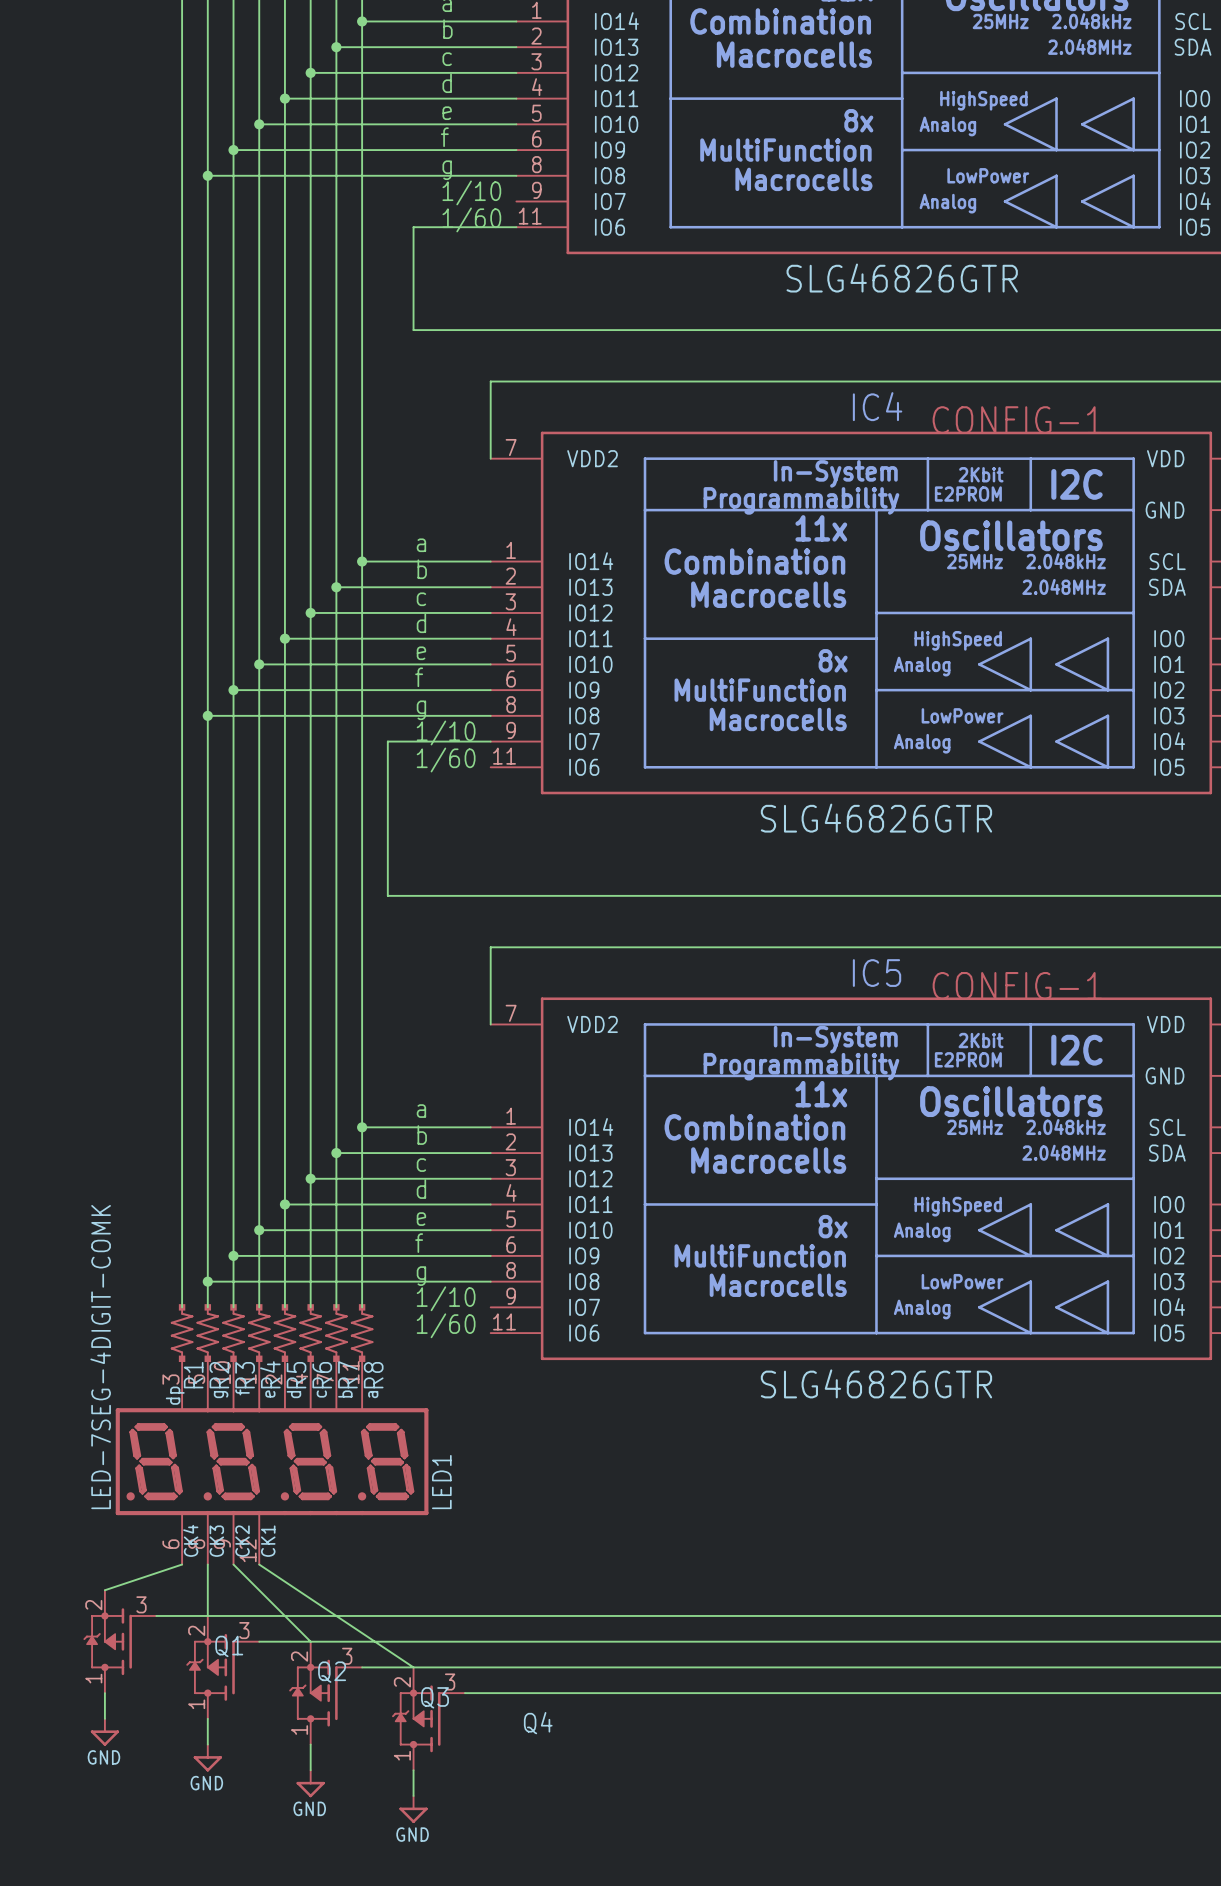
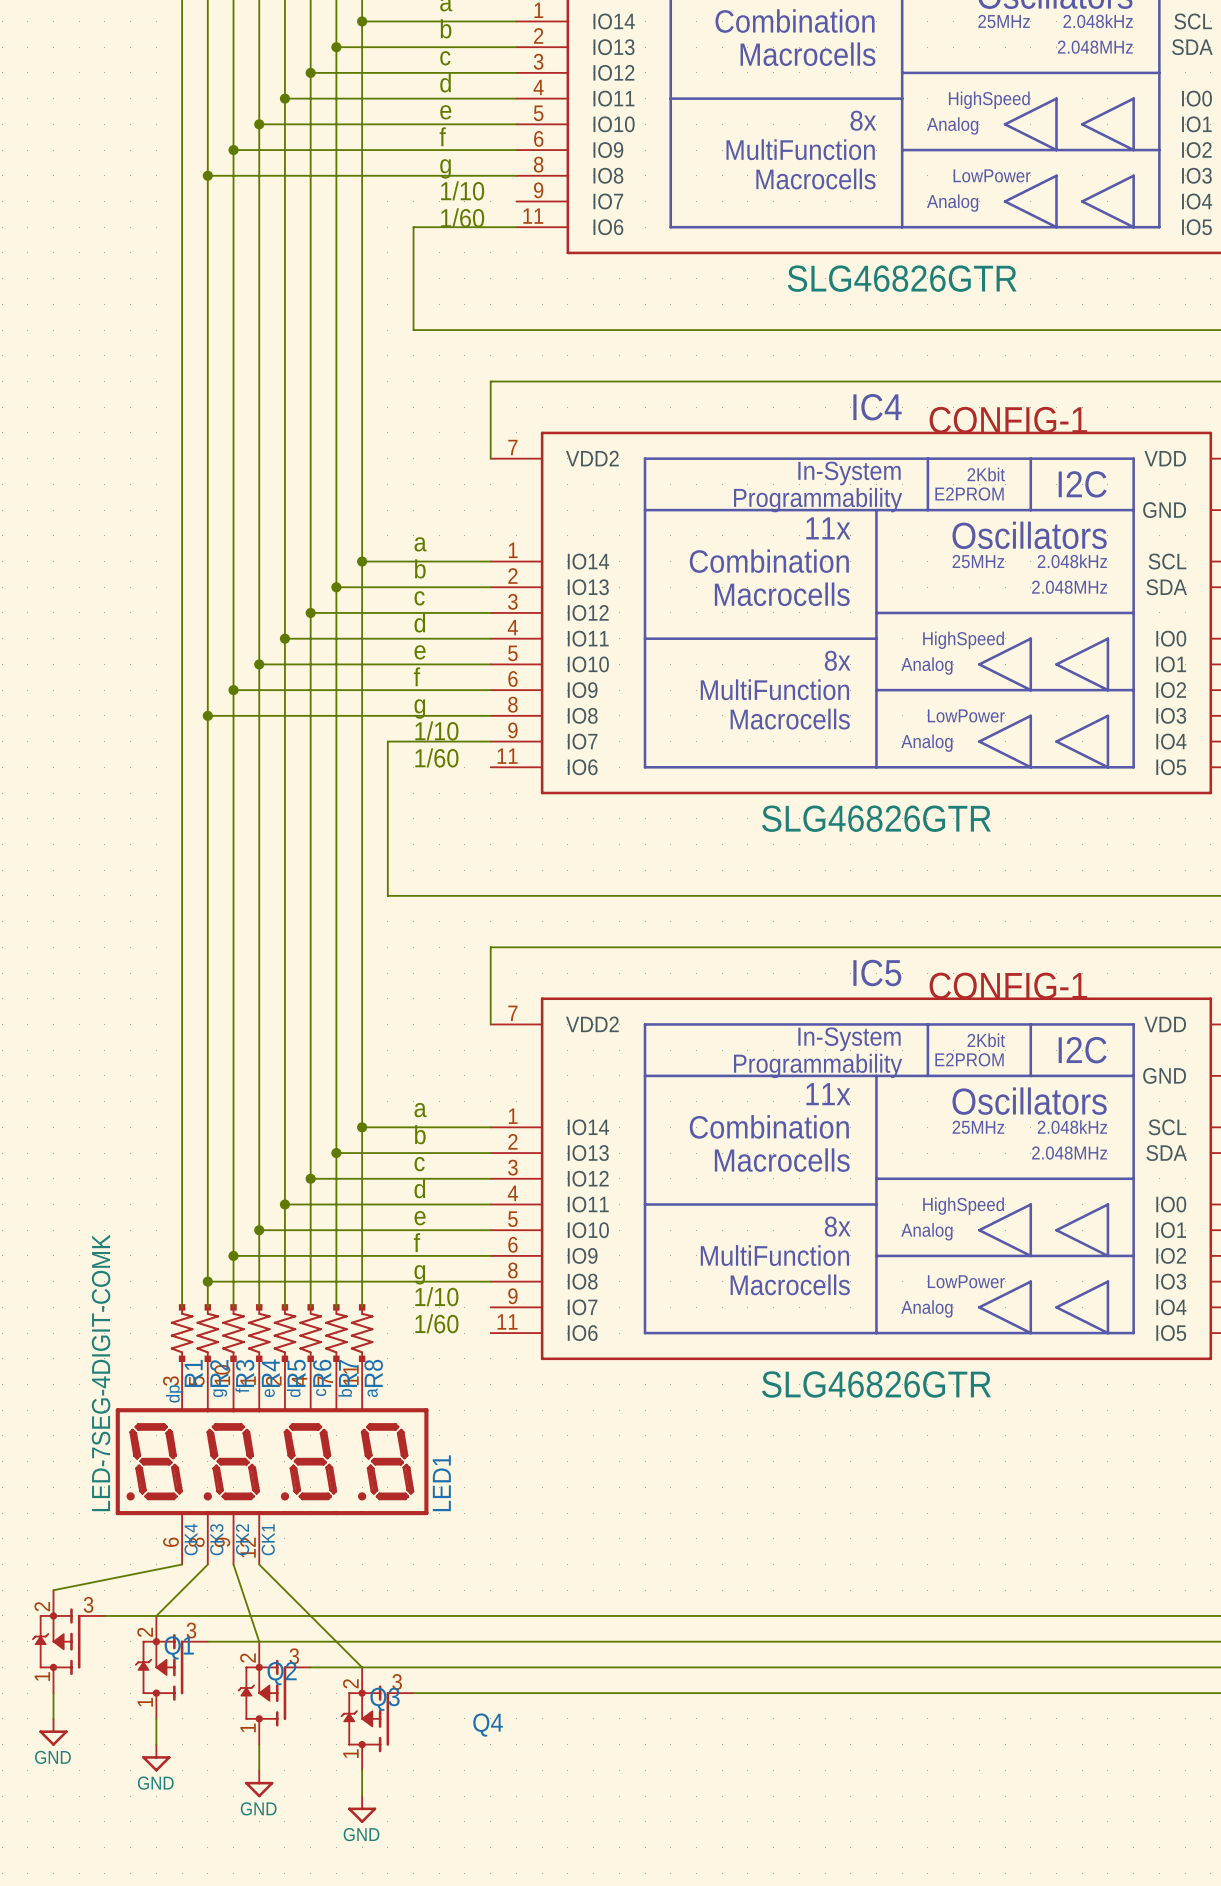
wire: (182, 1564) (104, 1590) -> (182, 1564) (53, 1590)
wire: (207, 1564) (207, 1615) -> (207, 1564) (156, 1615) (104, 1615)
wire: (233, 1564) (310, 1641) -> (233, 1564) (259, 1641) (207, 1641)
wire: (259, 1564) (413, 1667) -> (259, 1564) (362, 1667) (310, 1667)
Q1 position: (119, 1641) -> (68, 1641)
Q2 position: (222, 1667) -> (171, 1667)
wire: (104, 1693) (104, 1718) -> (53, 1693) (53, 1718)
Q3 position: (325, 1693) -> (274, 1693)
wire: (207, 1718) (207, 1744) -> (156, 1718) (156, 1744)
Q4 position: (428, 1718) -> (377, 1718)
power symbol: none -> GND (53, 1731)
power symbol: GND (104, 1731) -> none
wire: (310, 1744) (310, 1770) -> (259, 1744) (259, 1770)
power symbol: none -> GND (156, 1757)
power symbol: GND (207, 1757) -> none
wire: (413, 1770) (413, 1796) -> (362, 1770) (362, 1796)
power symbol: none -> GND (259, 1783)
power symbol: GND (310, 1783) -> none
power symbol: none -> GND (362, 1809)
power symbol: GND (413, 1809) -> none

